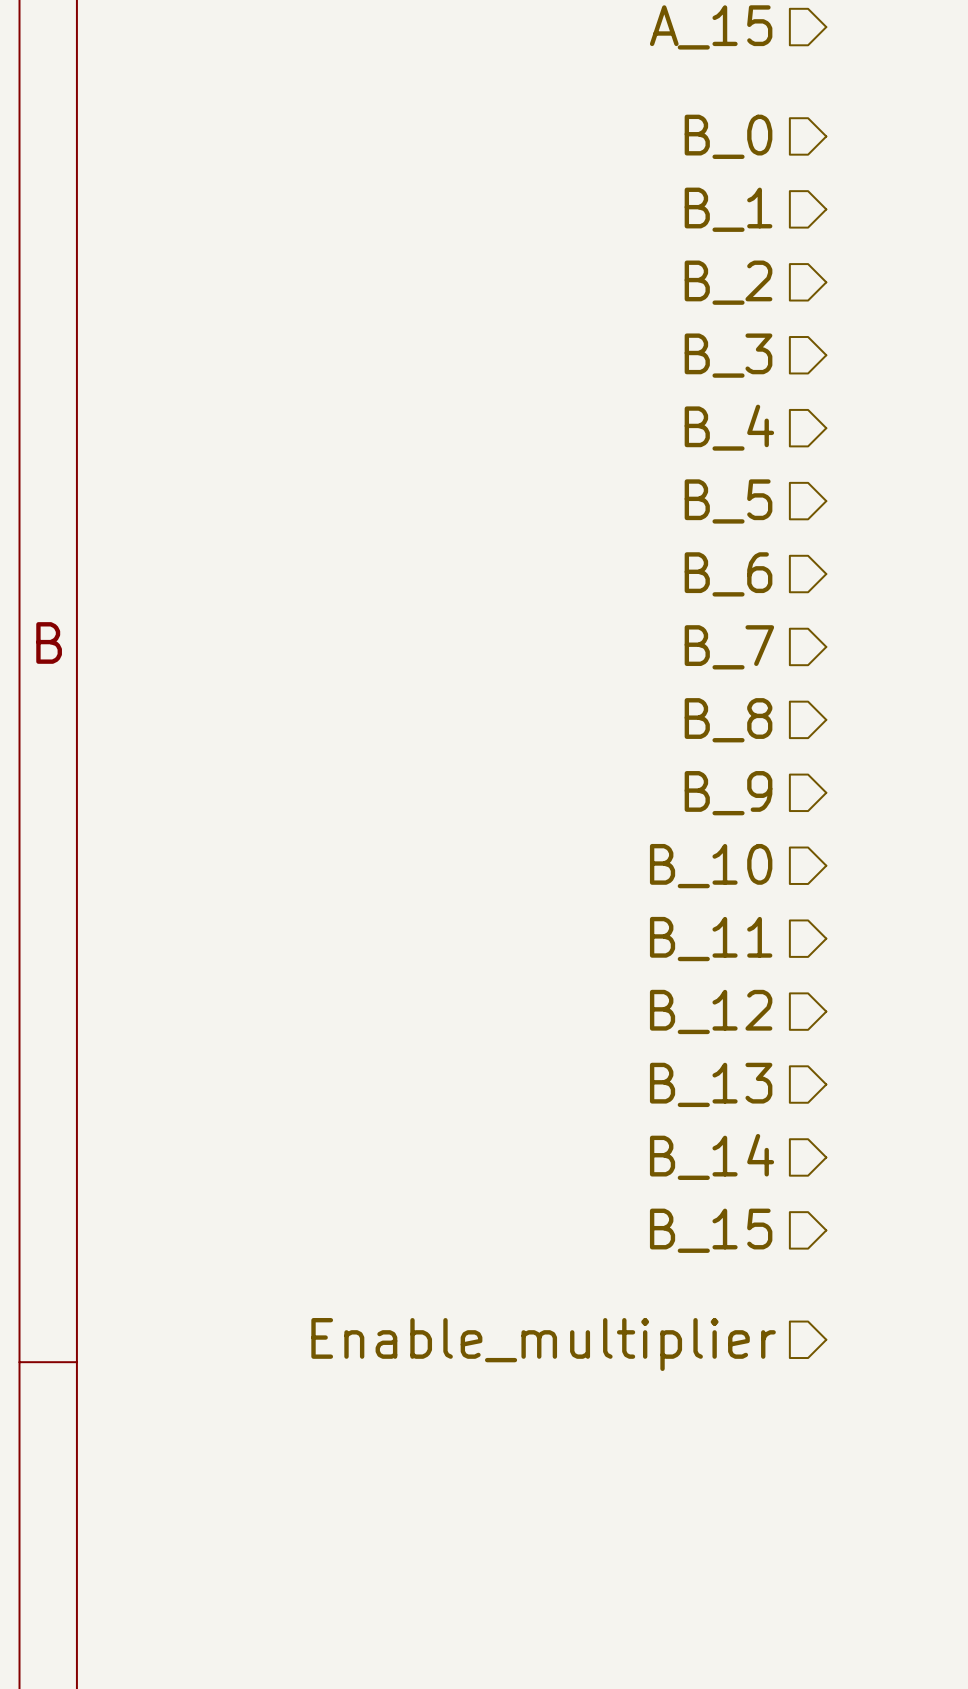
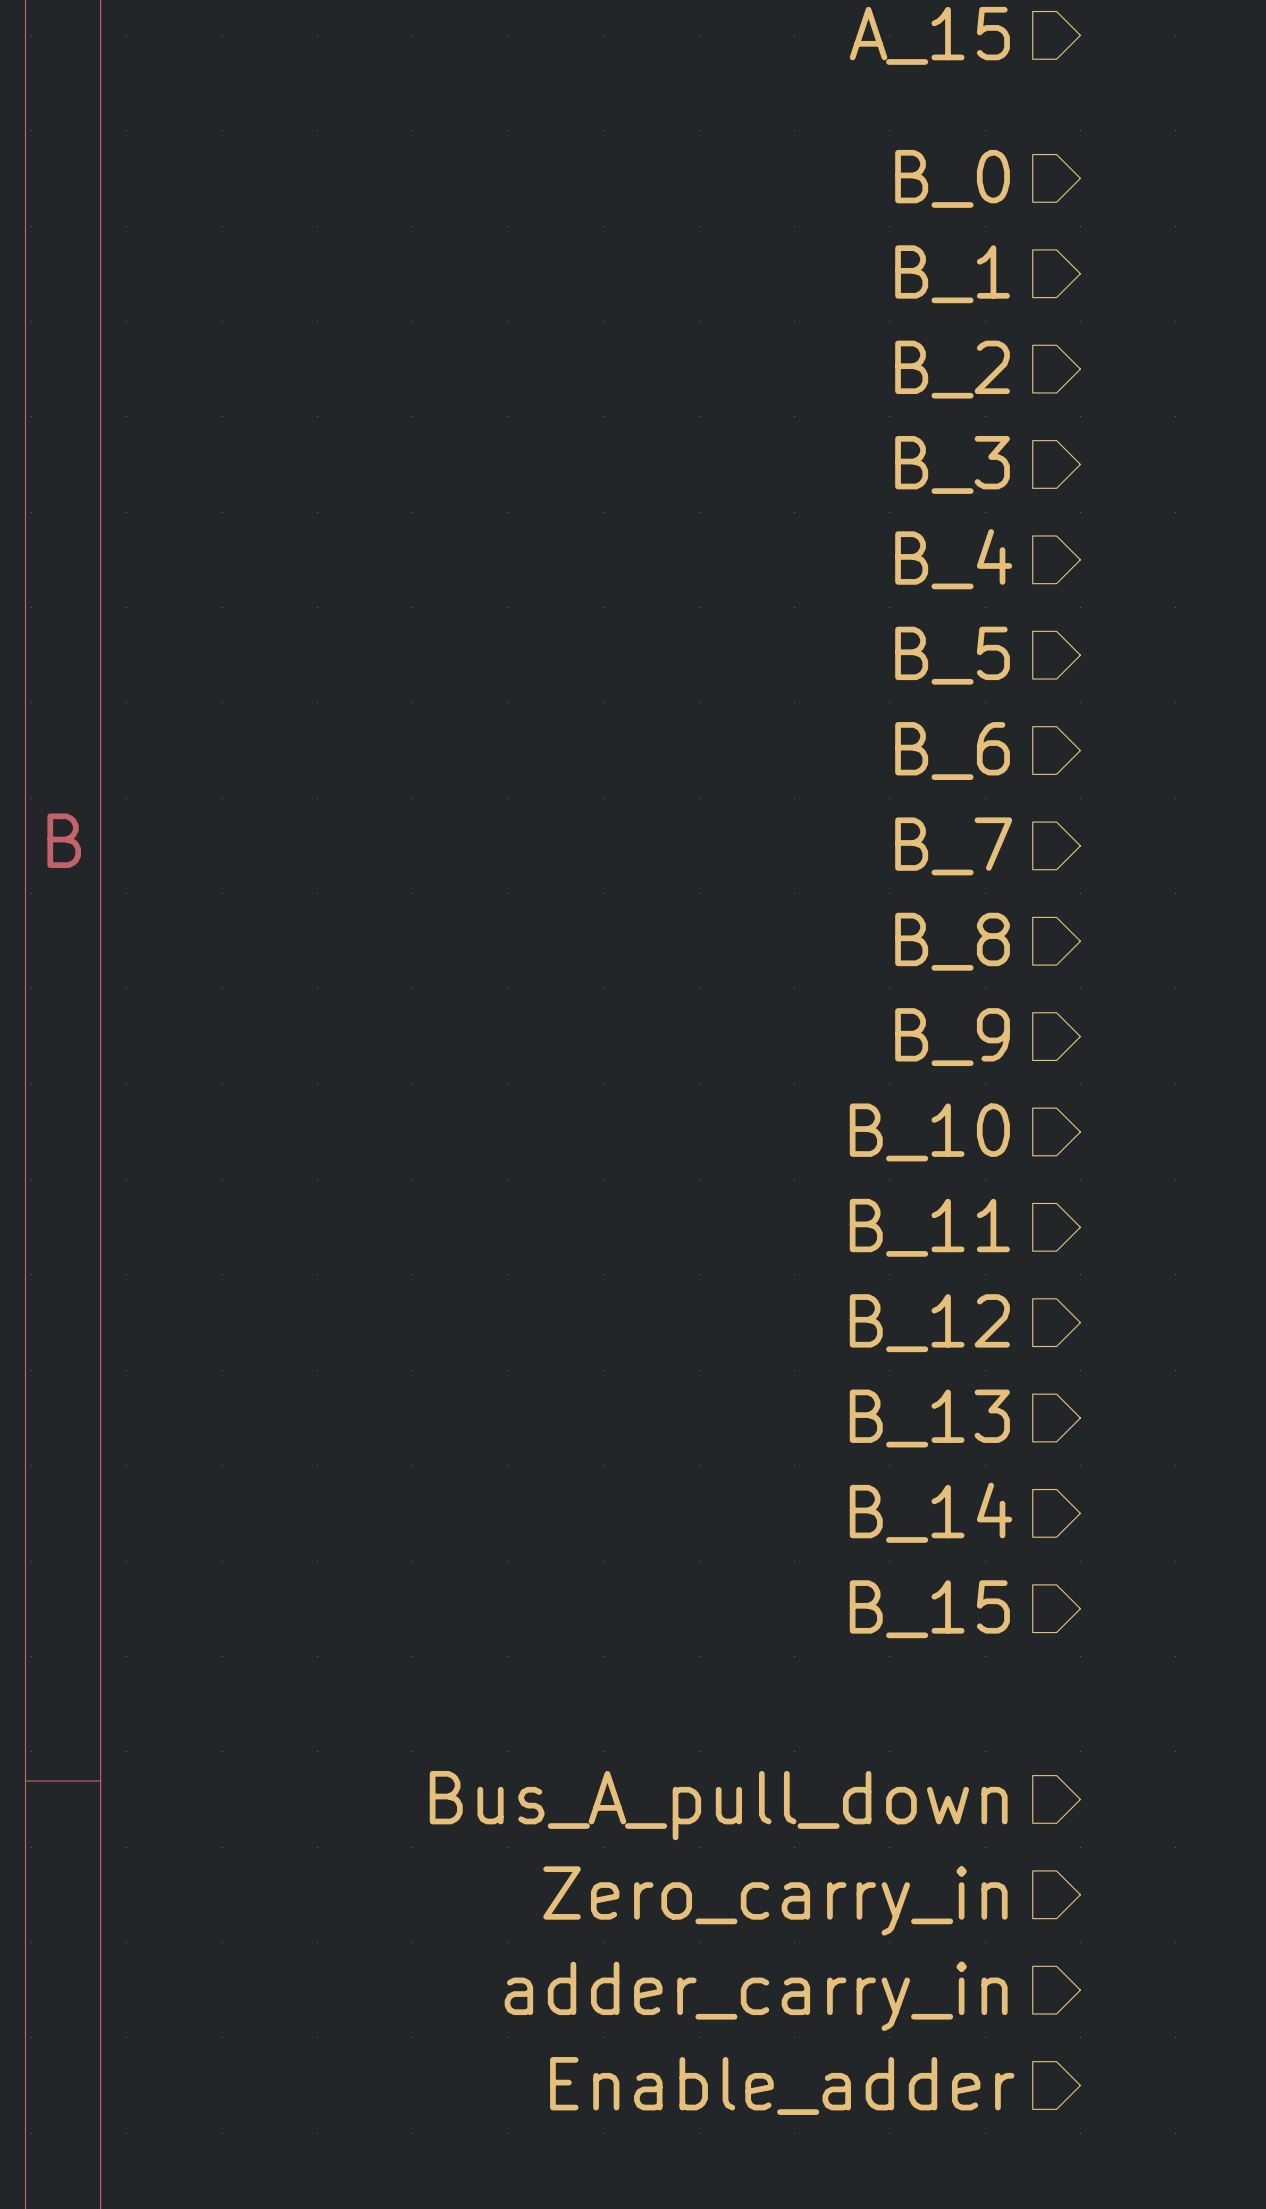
hierarchical label: Enable_multiplier (543, 1344) -> none
hierarchical label: none -> Bus_A_pull_down (718, 1805)
hierarchical label: none -> Zero_carry_in (775, 1900)
hierarchical label: none -> adder_carry_in (756, 1996)
hierarchical label: none -> Enable_adder (782, 2085)

